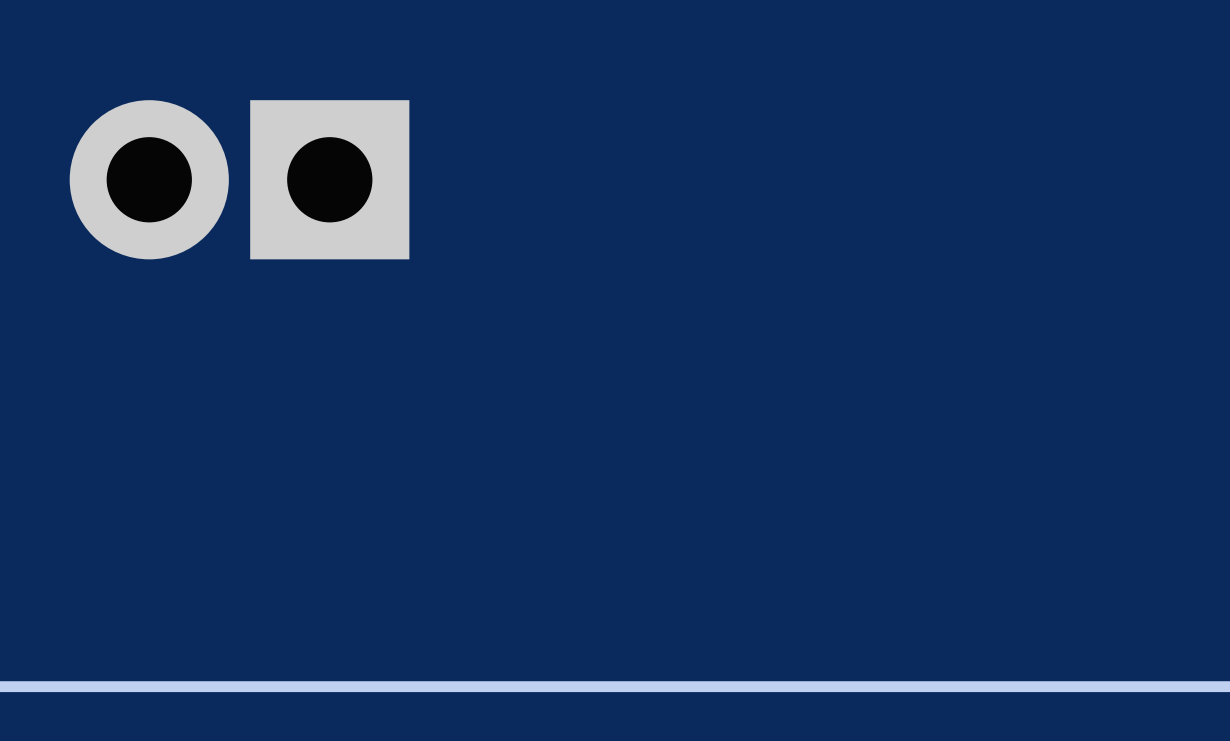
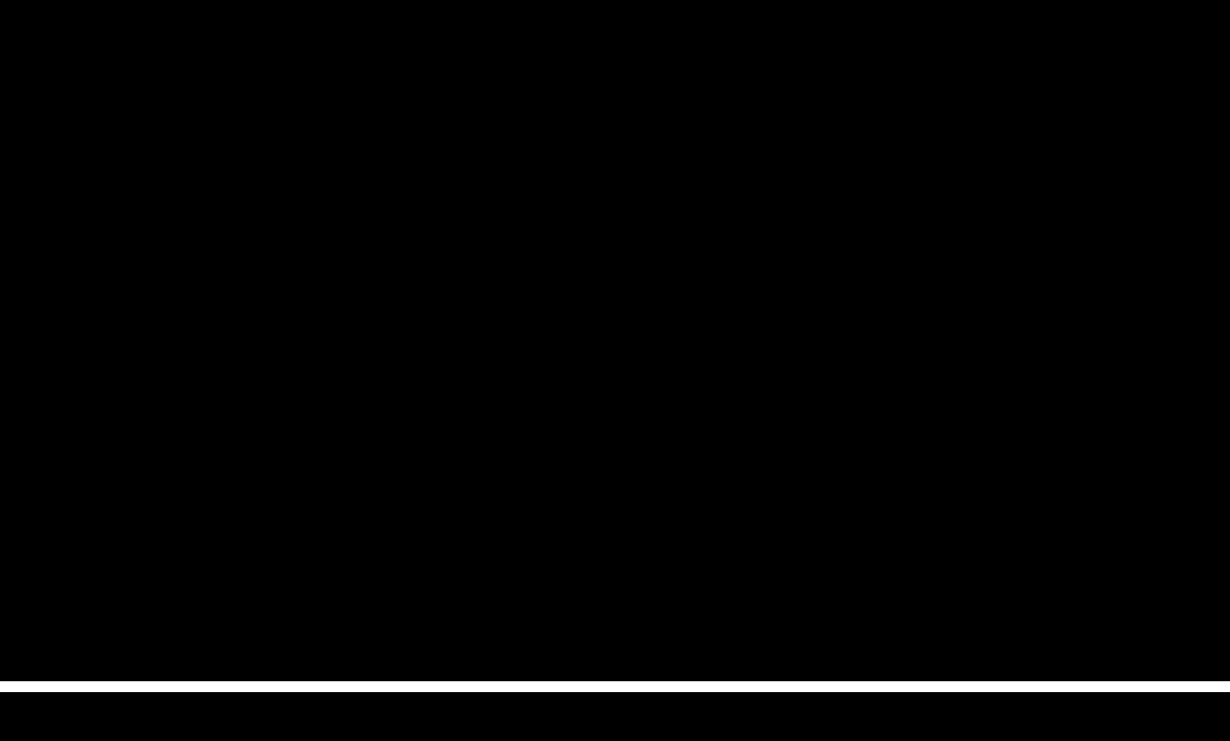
part: (239, 179) -> none

